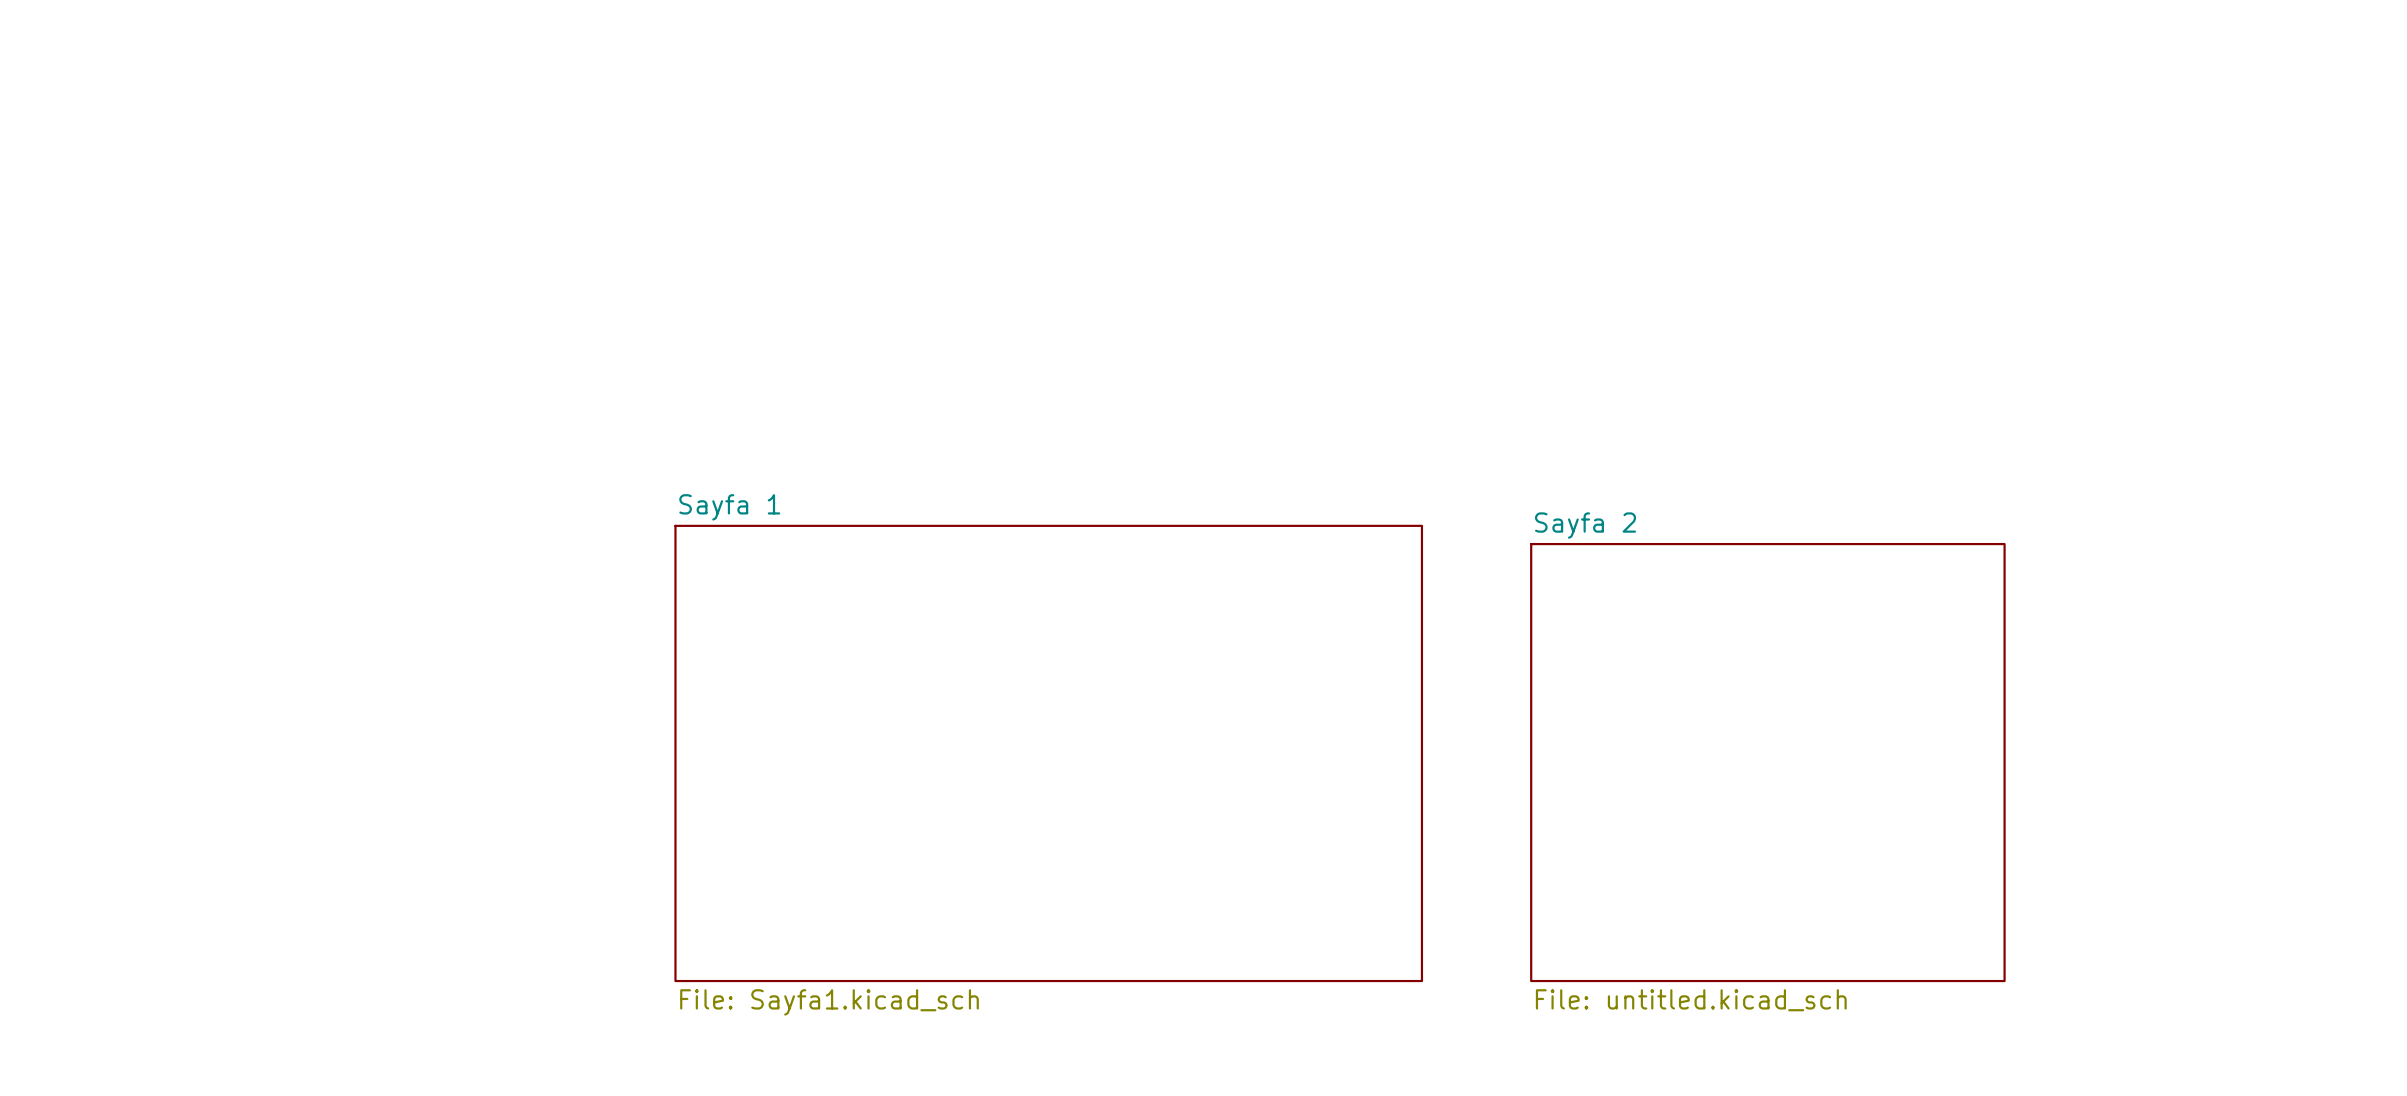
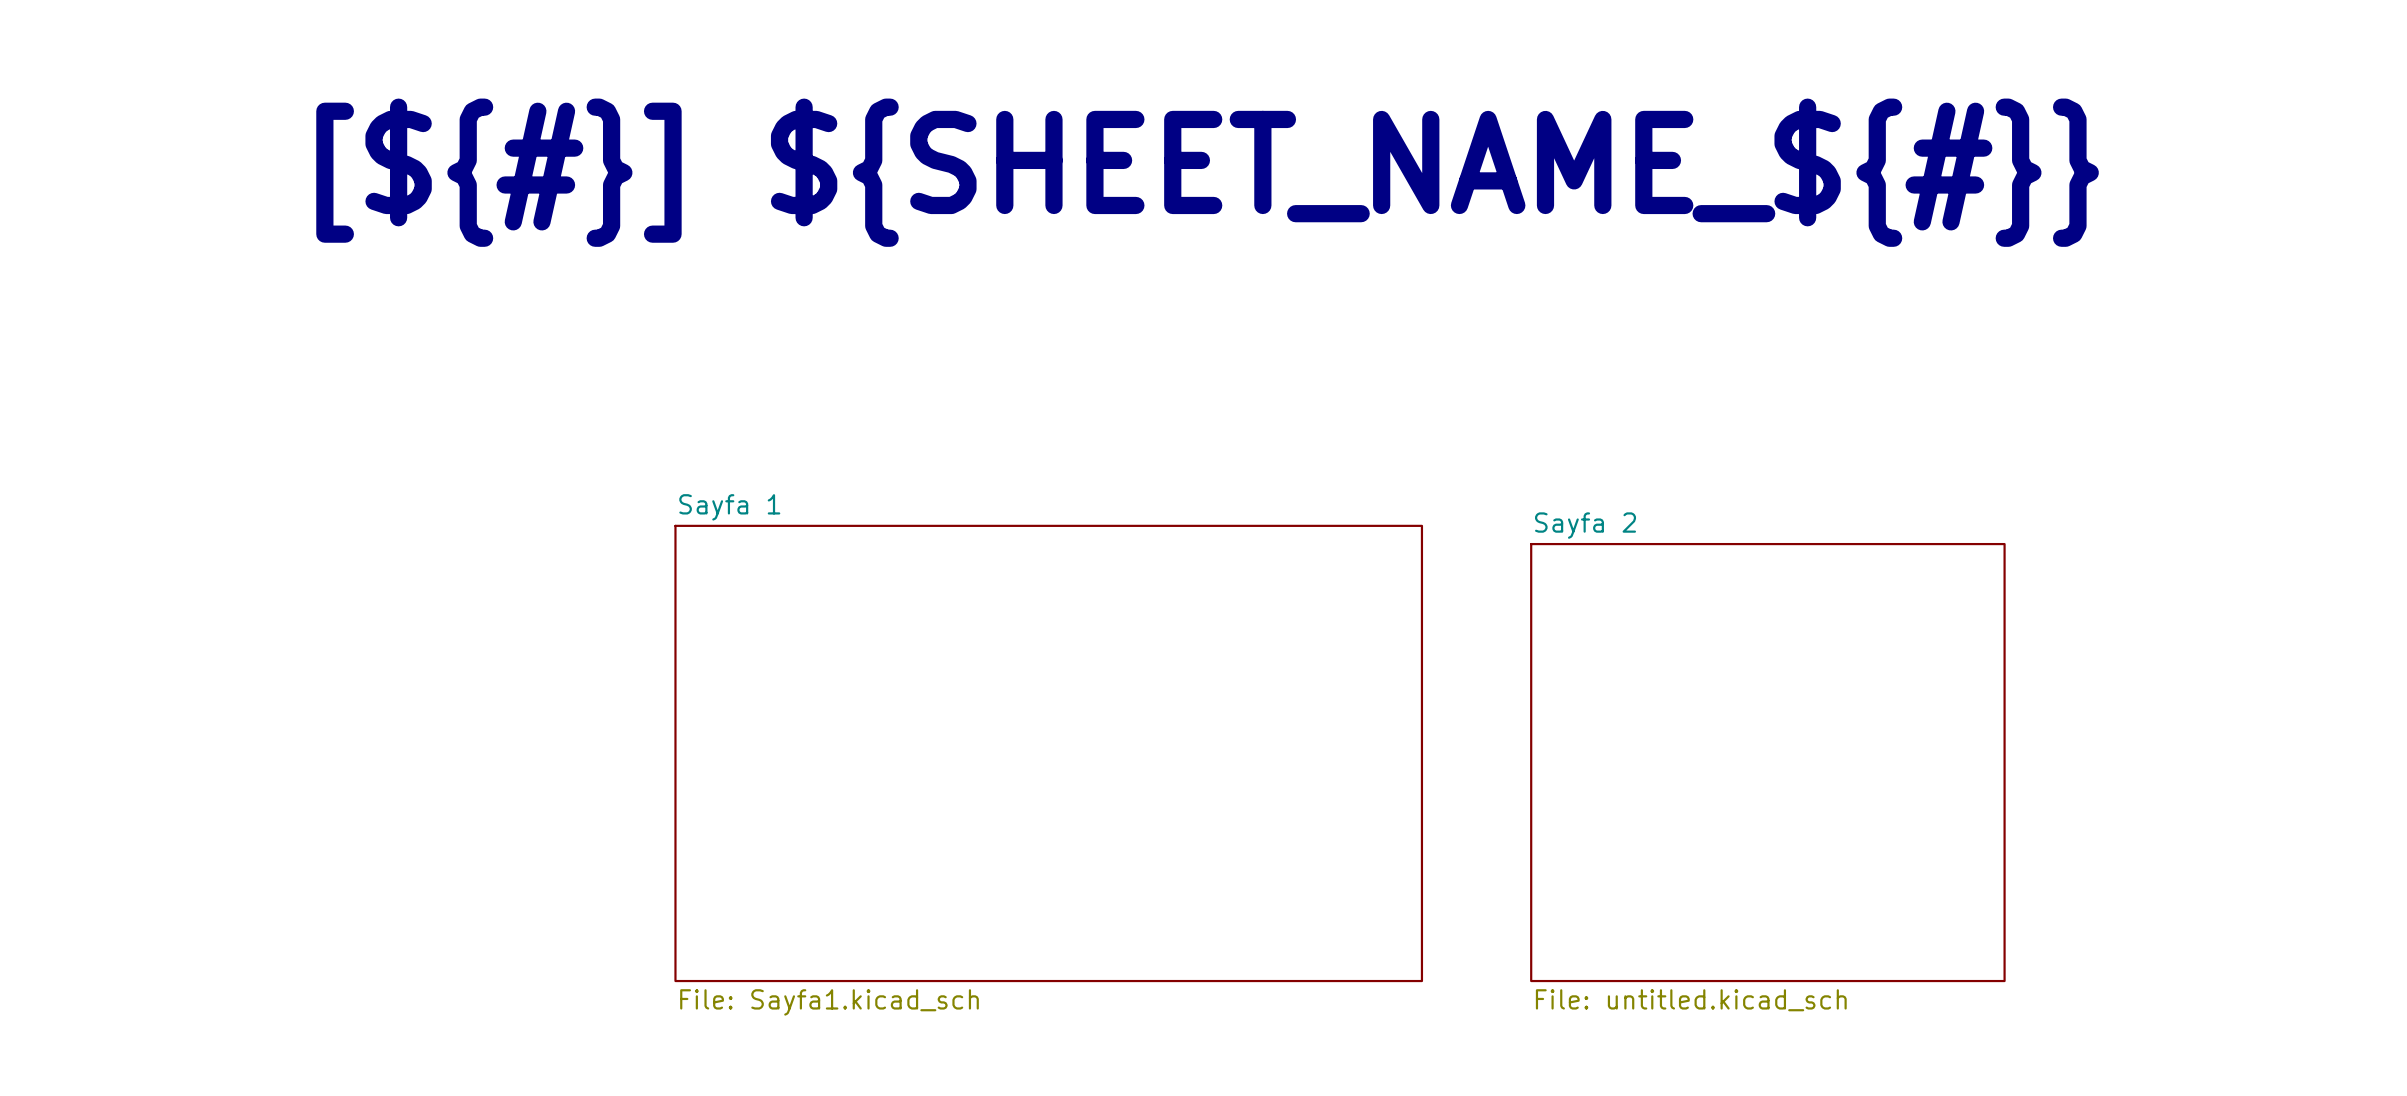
text: none -> [${#}] ${SHEET_NAME_${#}} (1207, 172)

